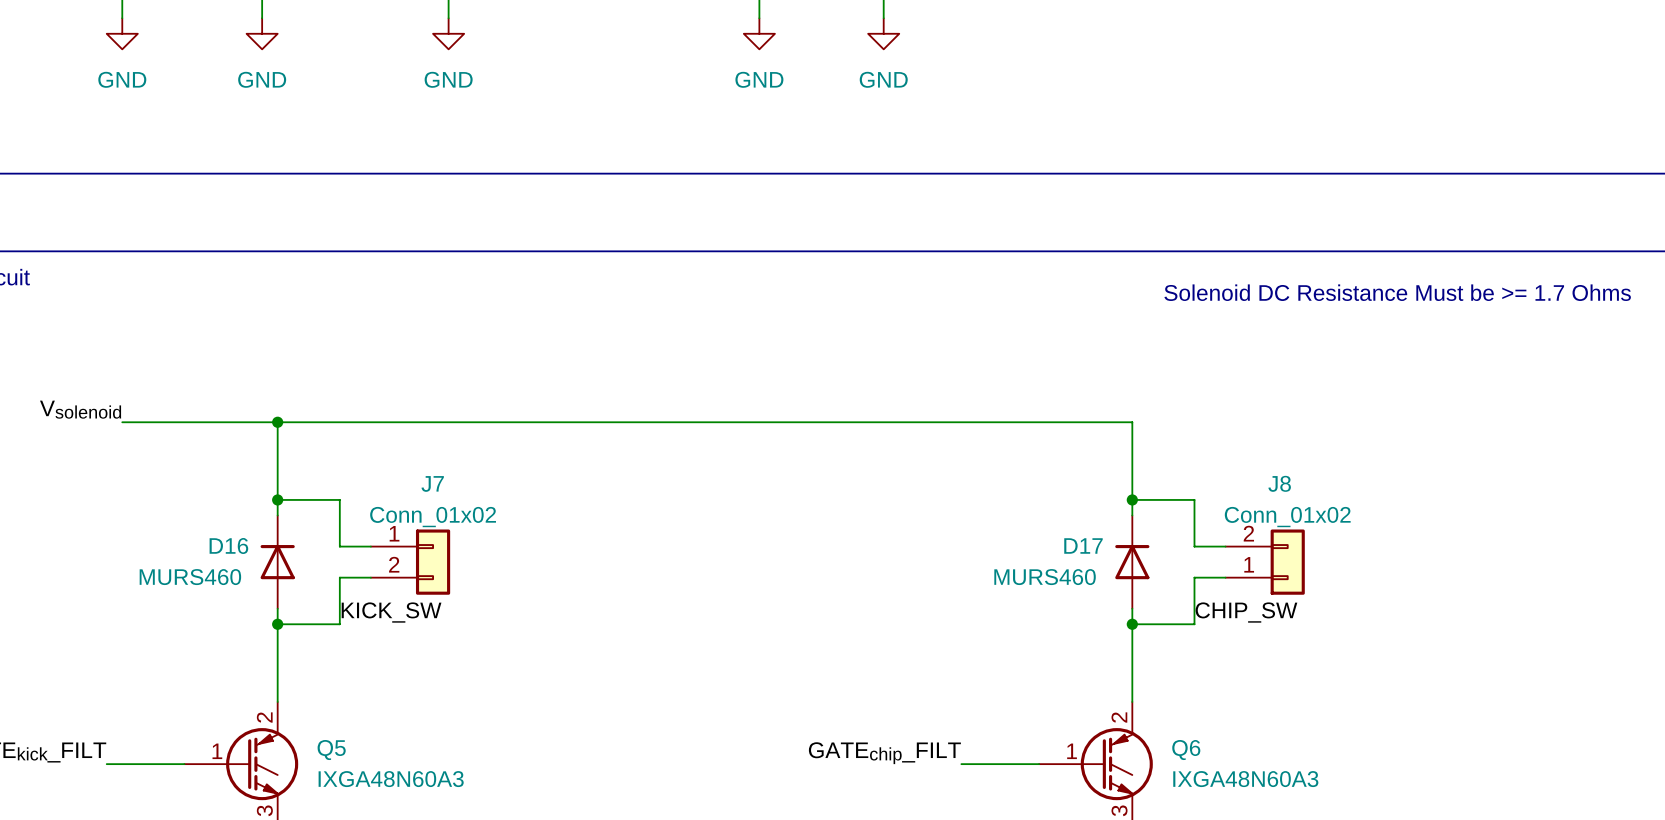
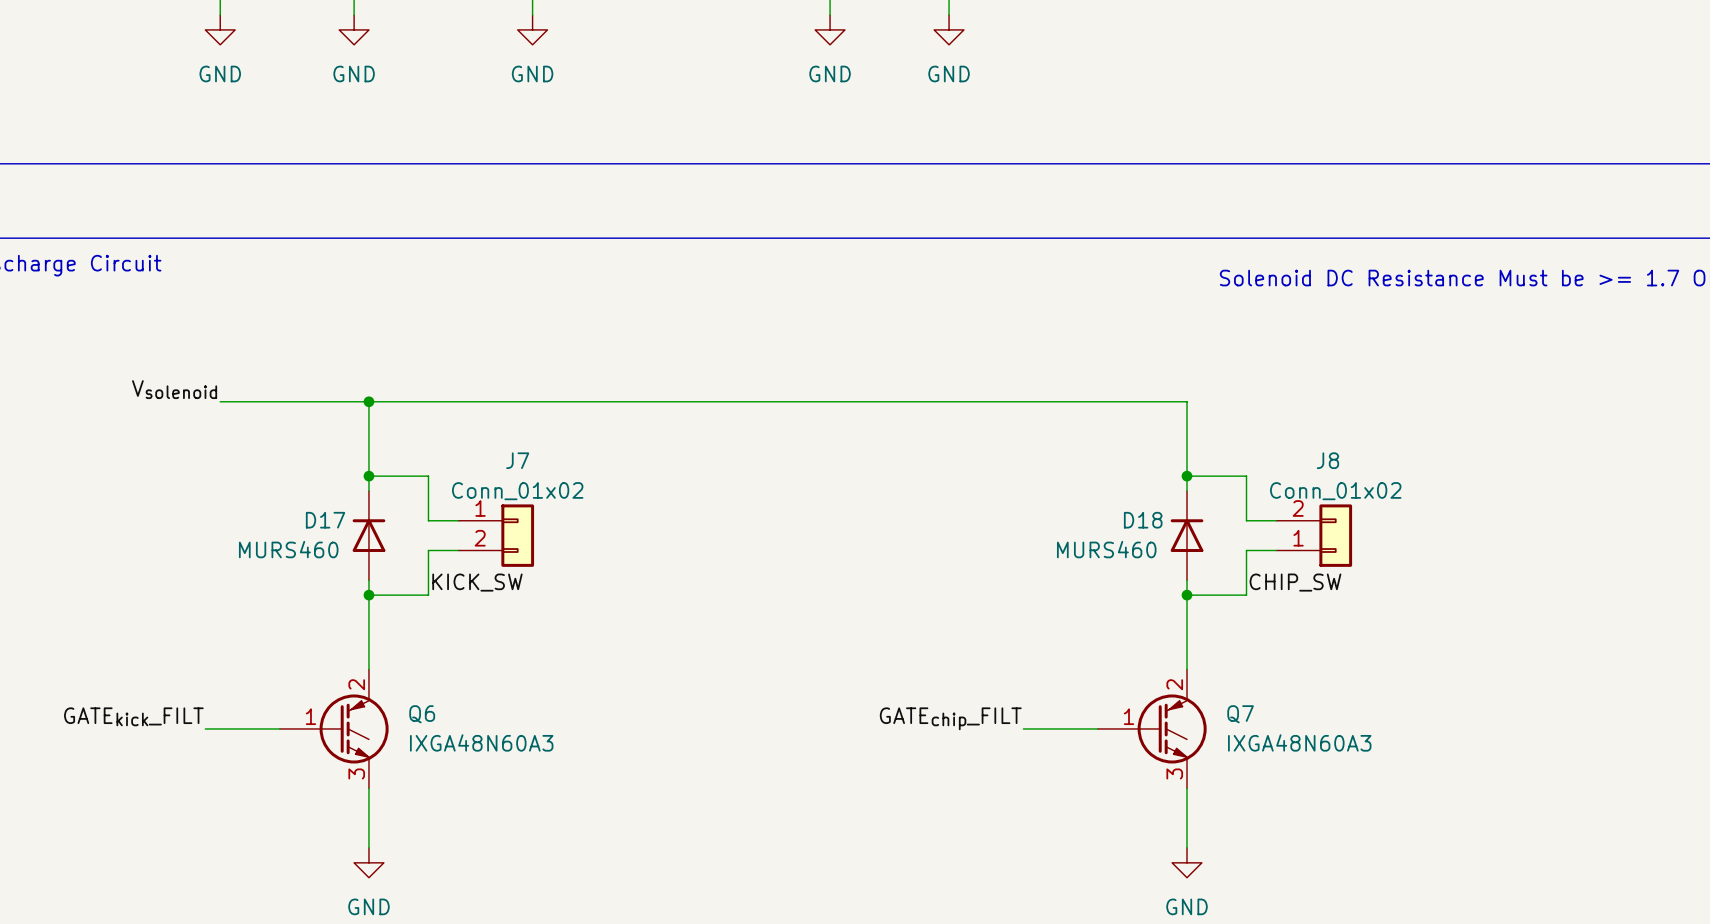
D16 name: D16 (228, 545) -> D17 (325, 520)
D17 name: D17 (1083, 546) -> D18 (1143, 520)
Q5 name: Q5 (331, 750) -> Q6 (422, 714)
Q6 name: Q6 (1186, 750) -> Q7 (1240, 714)

